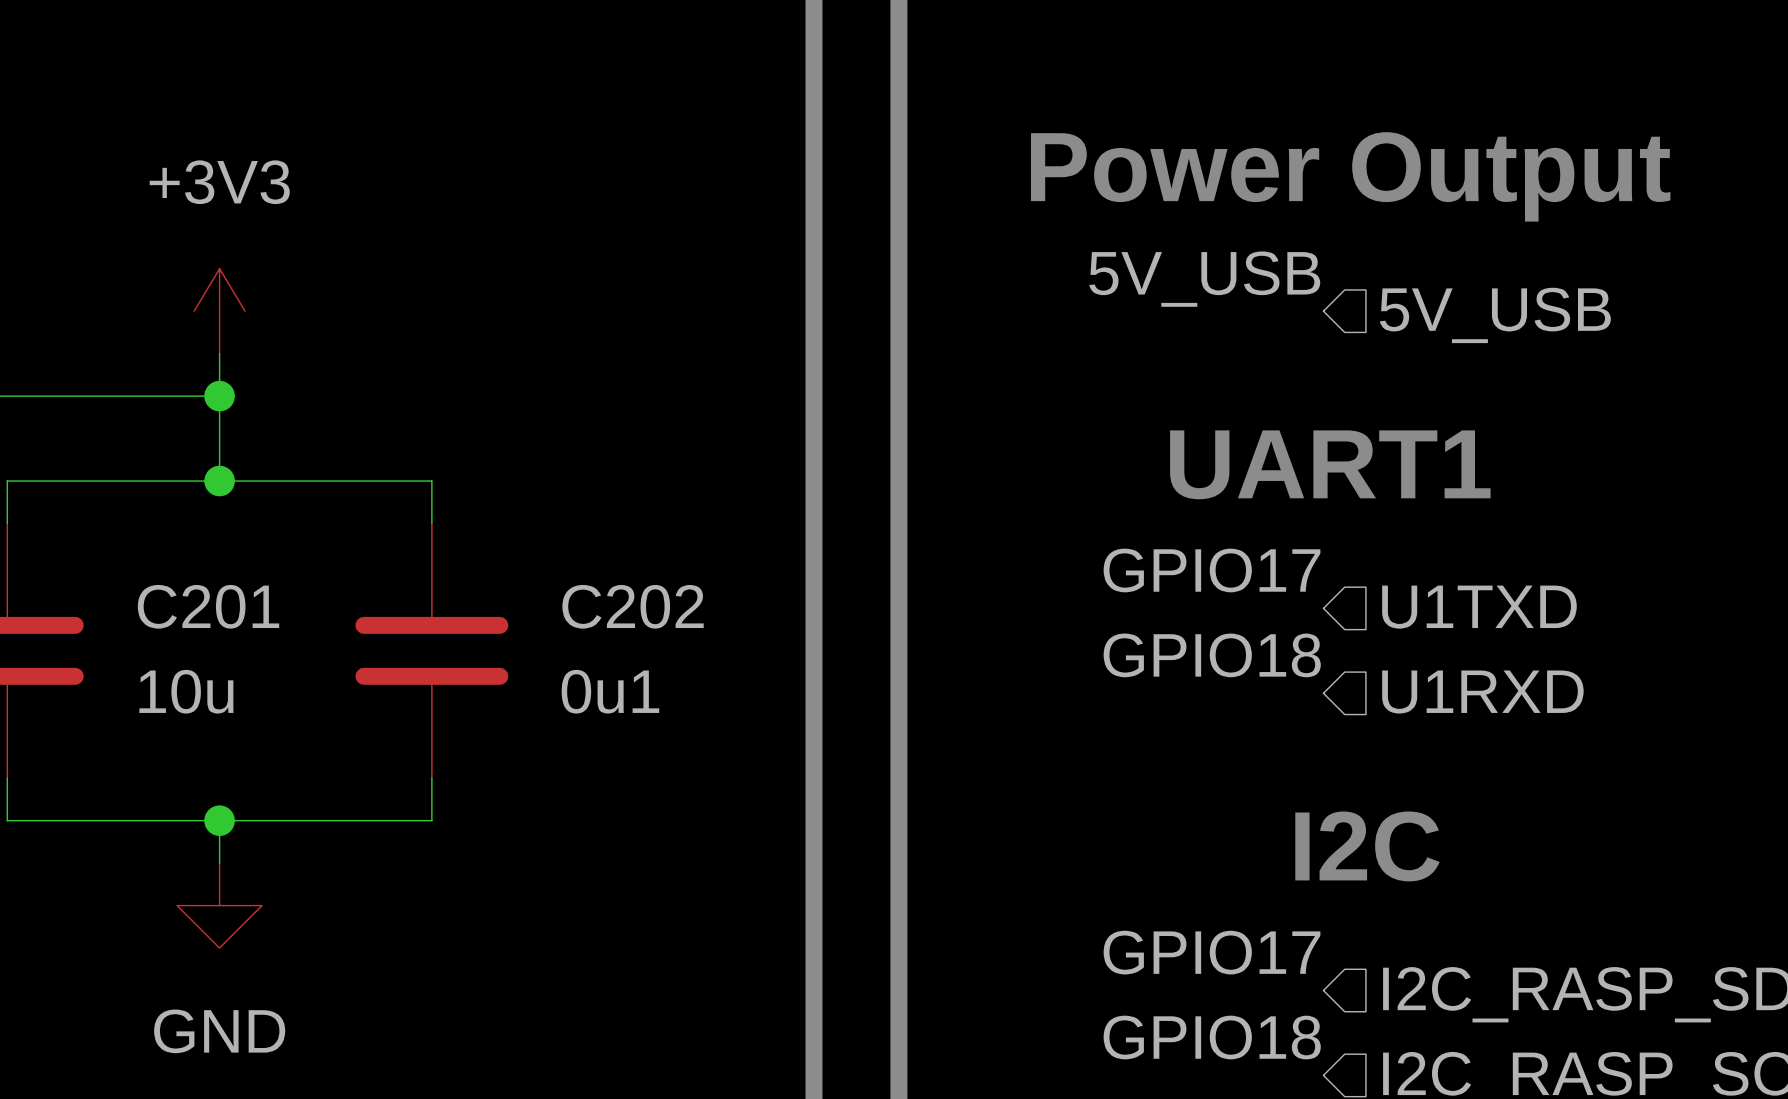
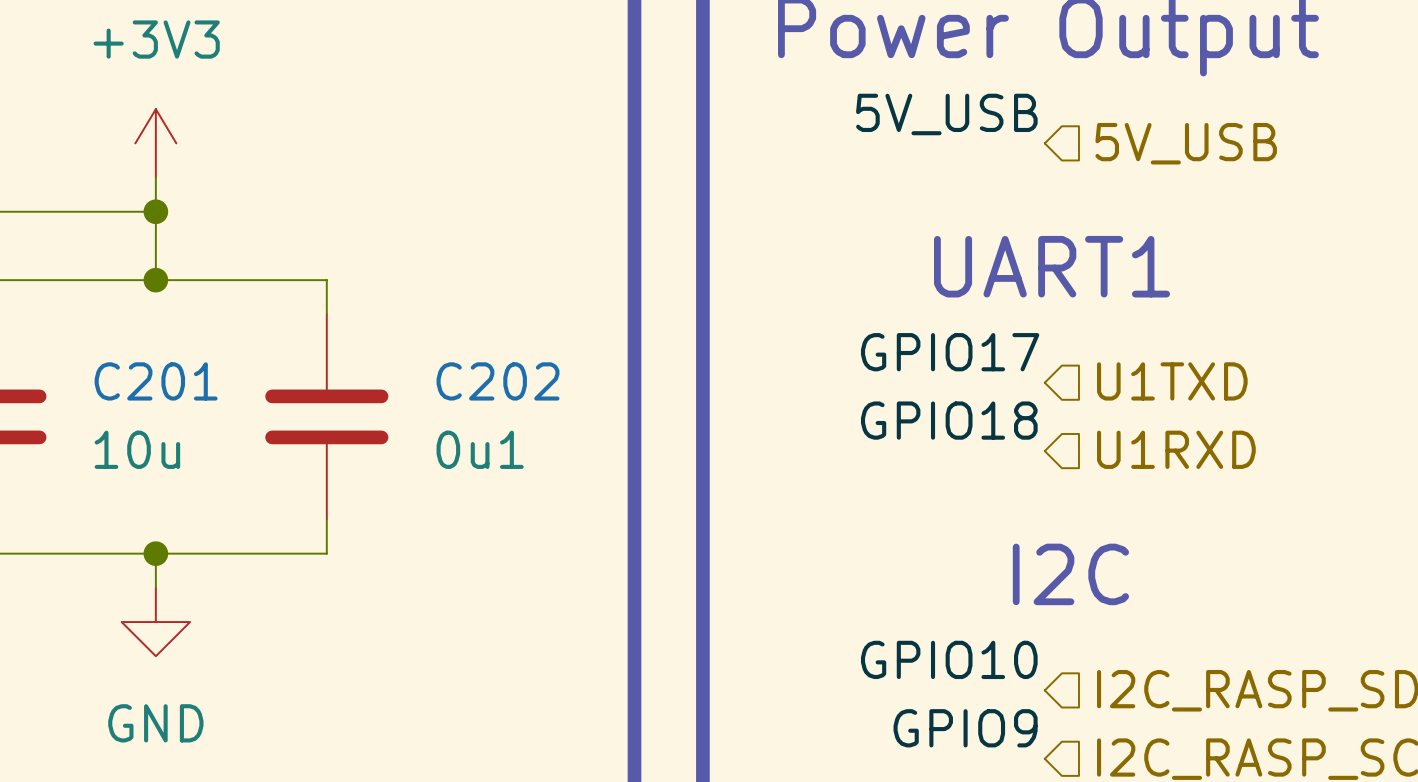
label: GPIO17 (1212, 952) -> GPIO10 (949, 659)
label: GPIO18 (1212, 1037) -> GPIO9 (965, 728)

